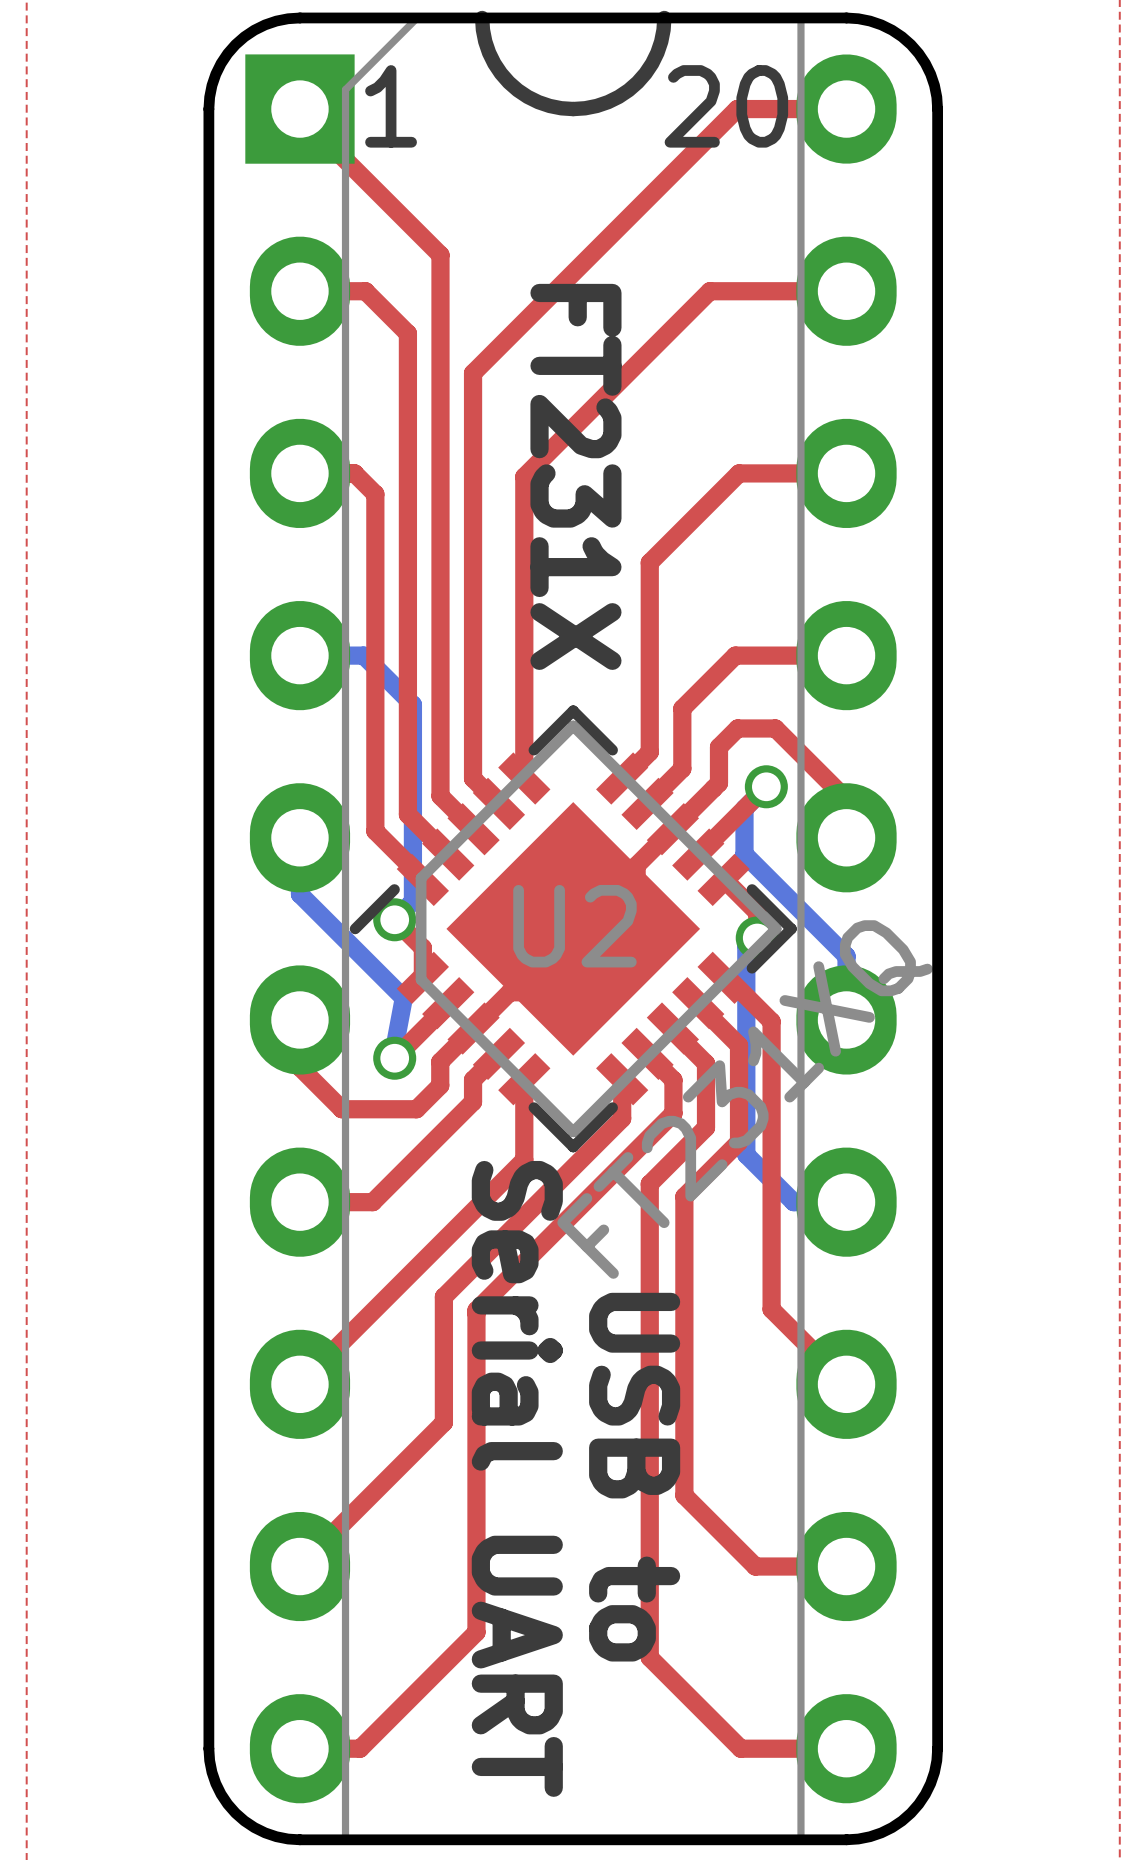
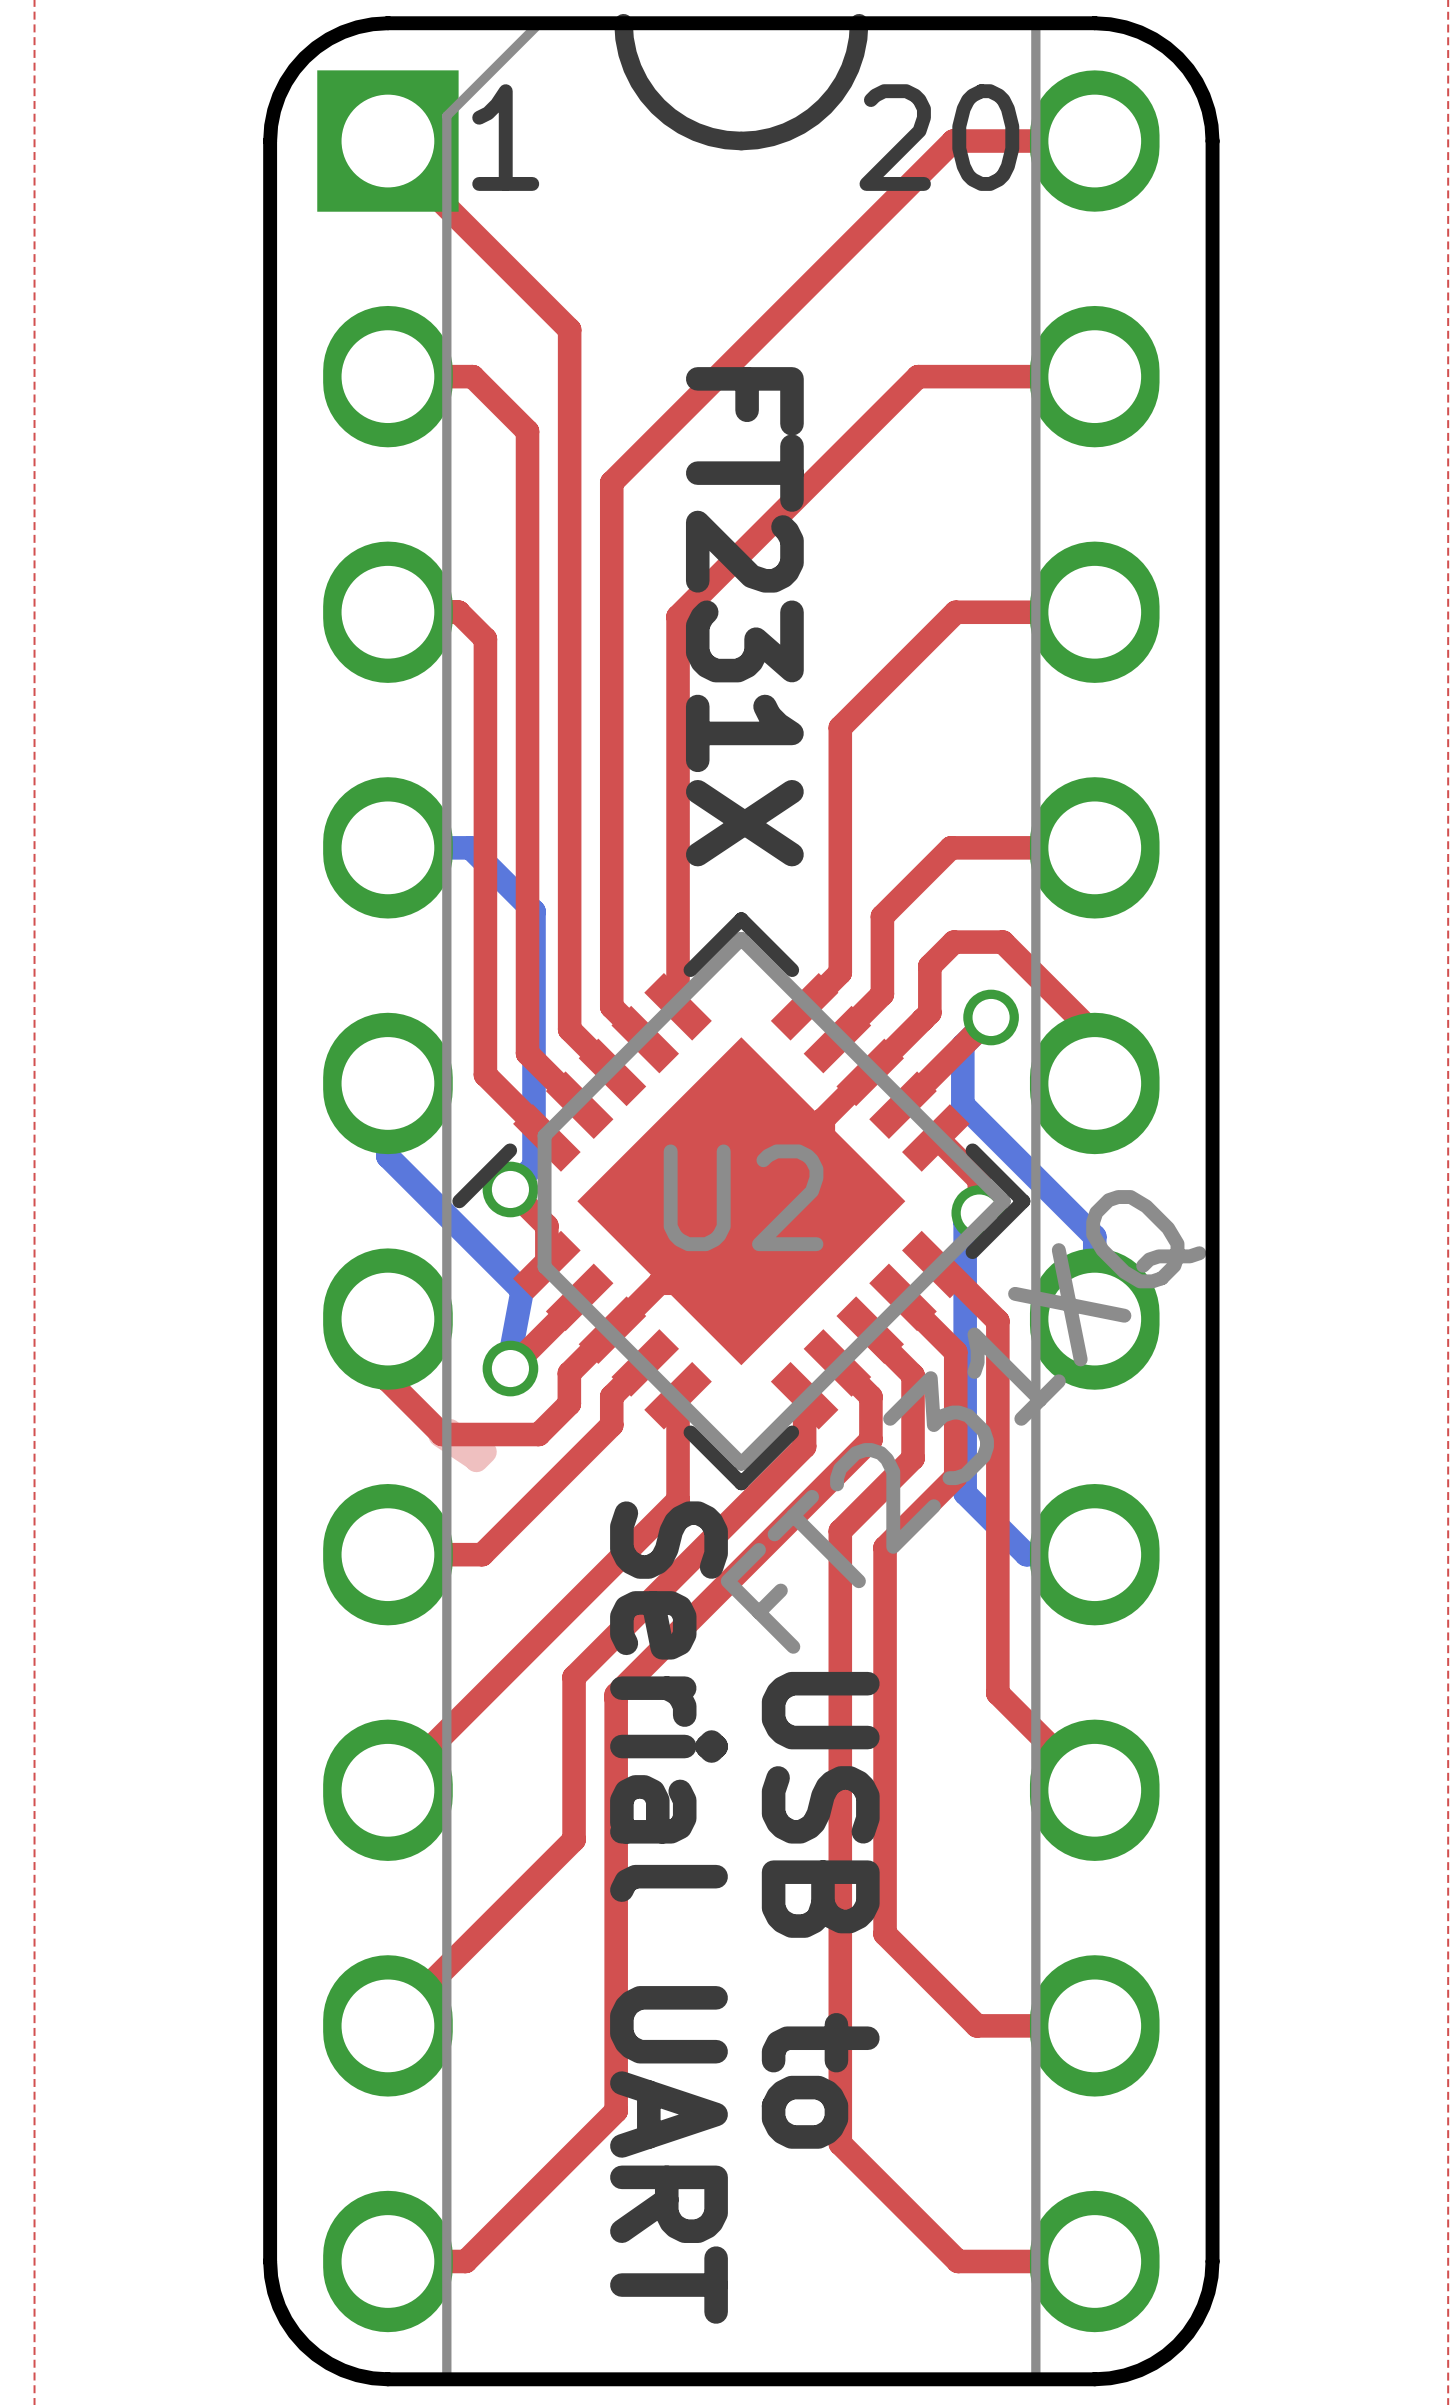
part footprint: [245, 10, 897, 1844] -> [317, 13, 1160, 2384]

